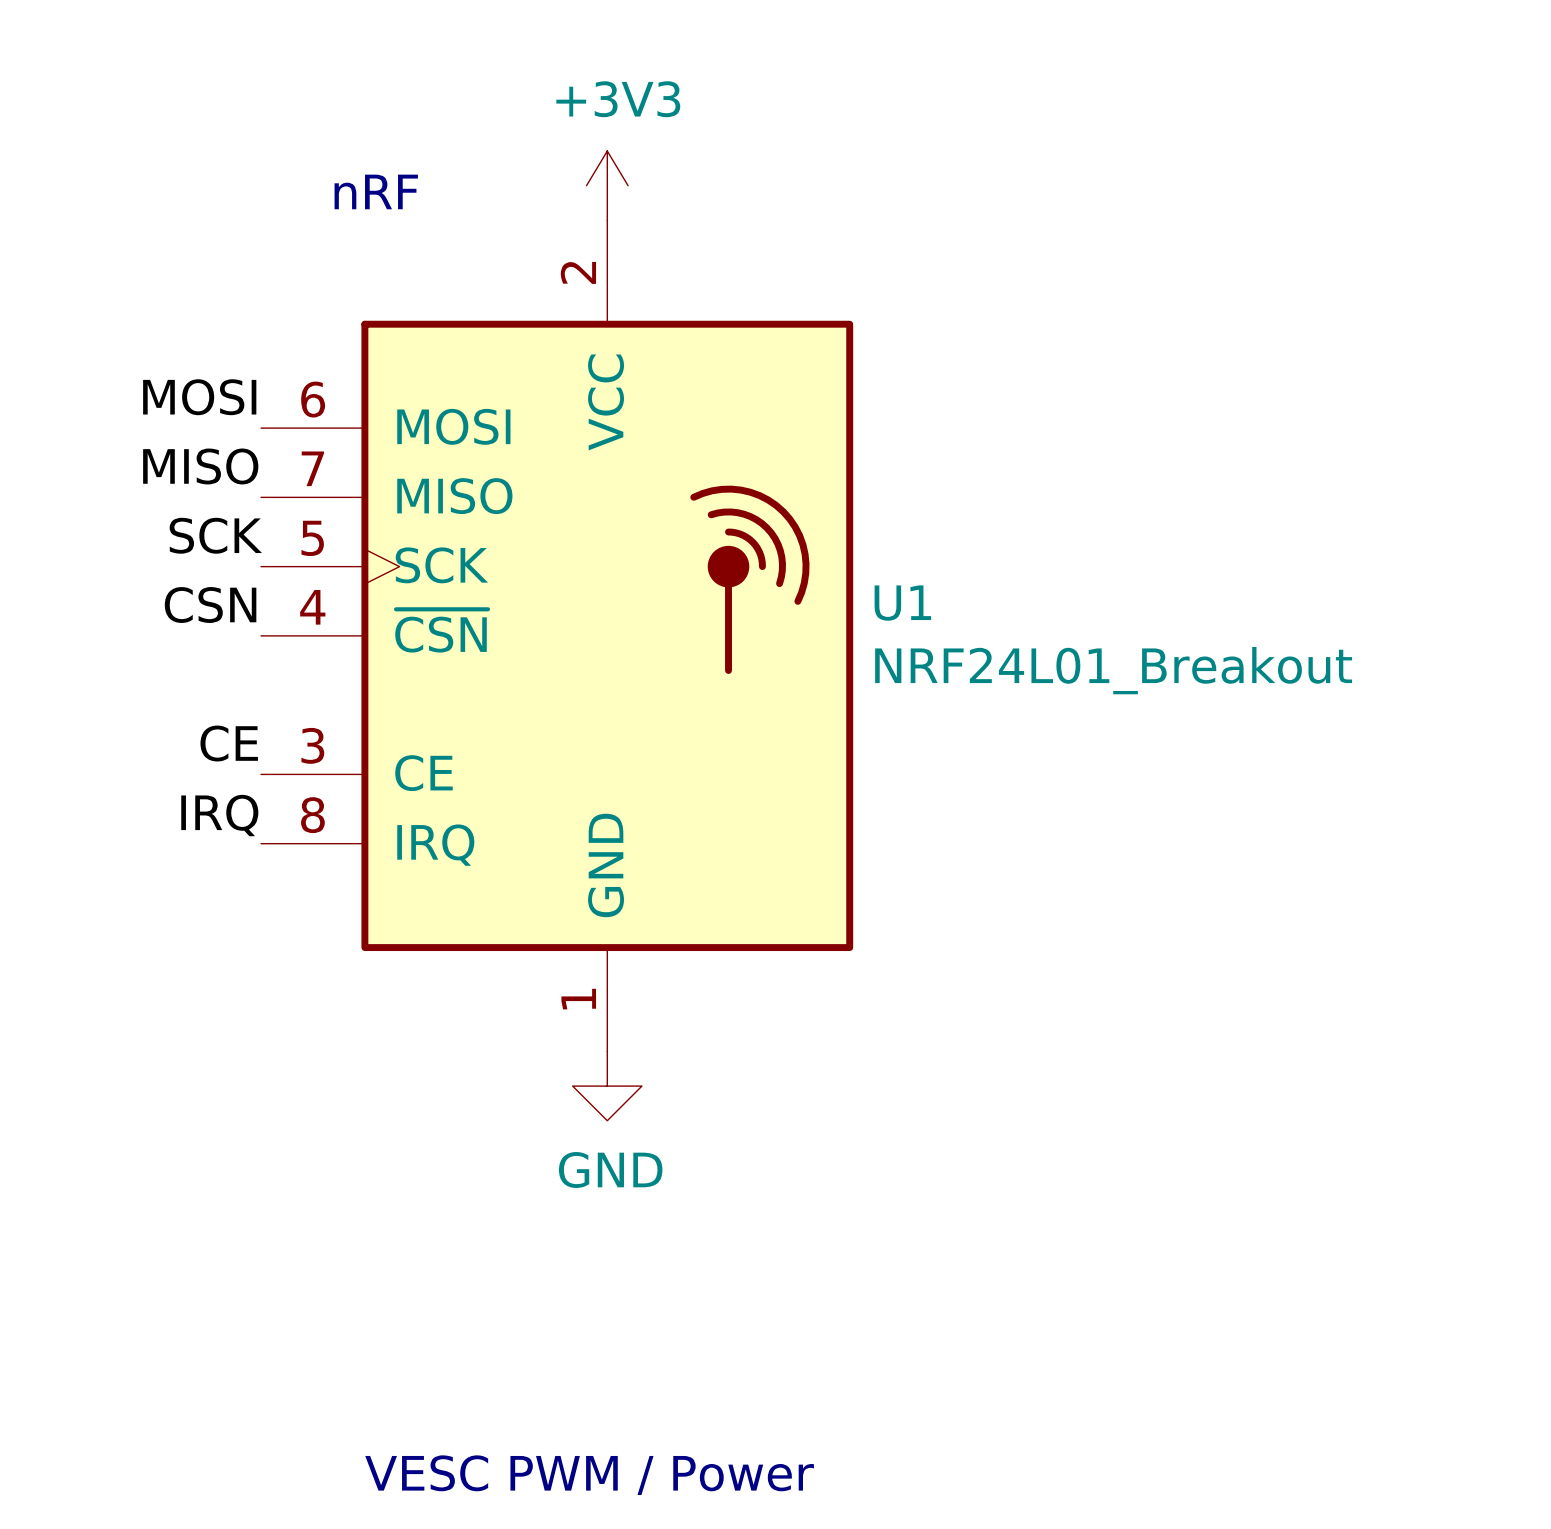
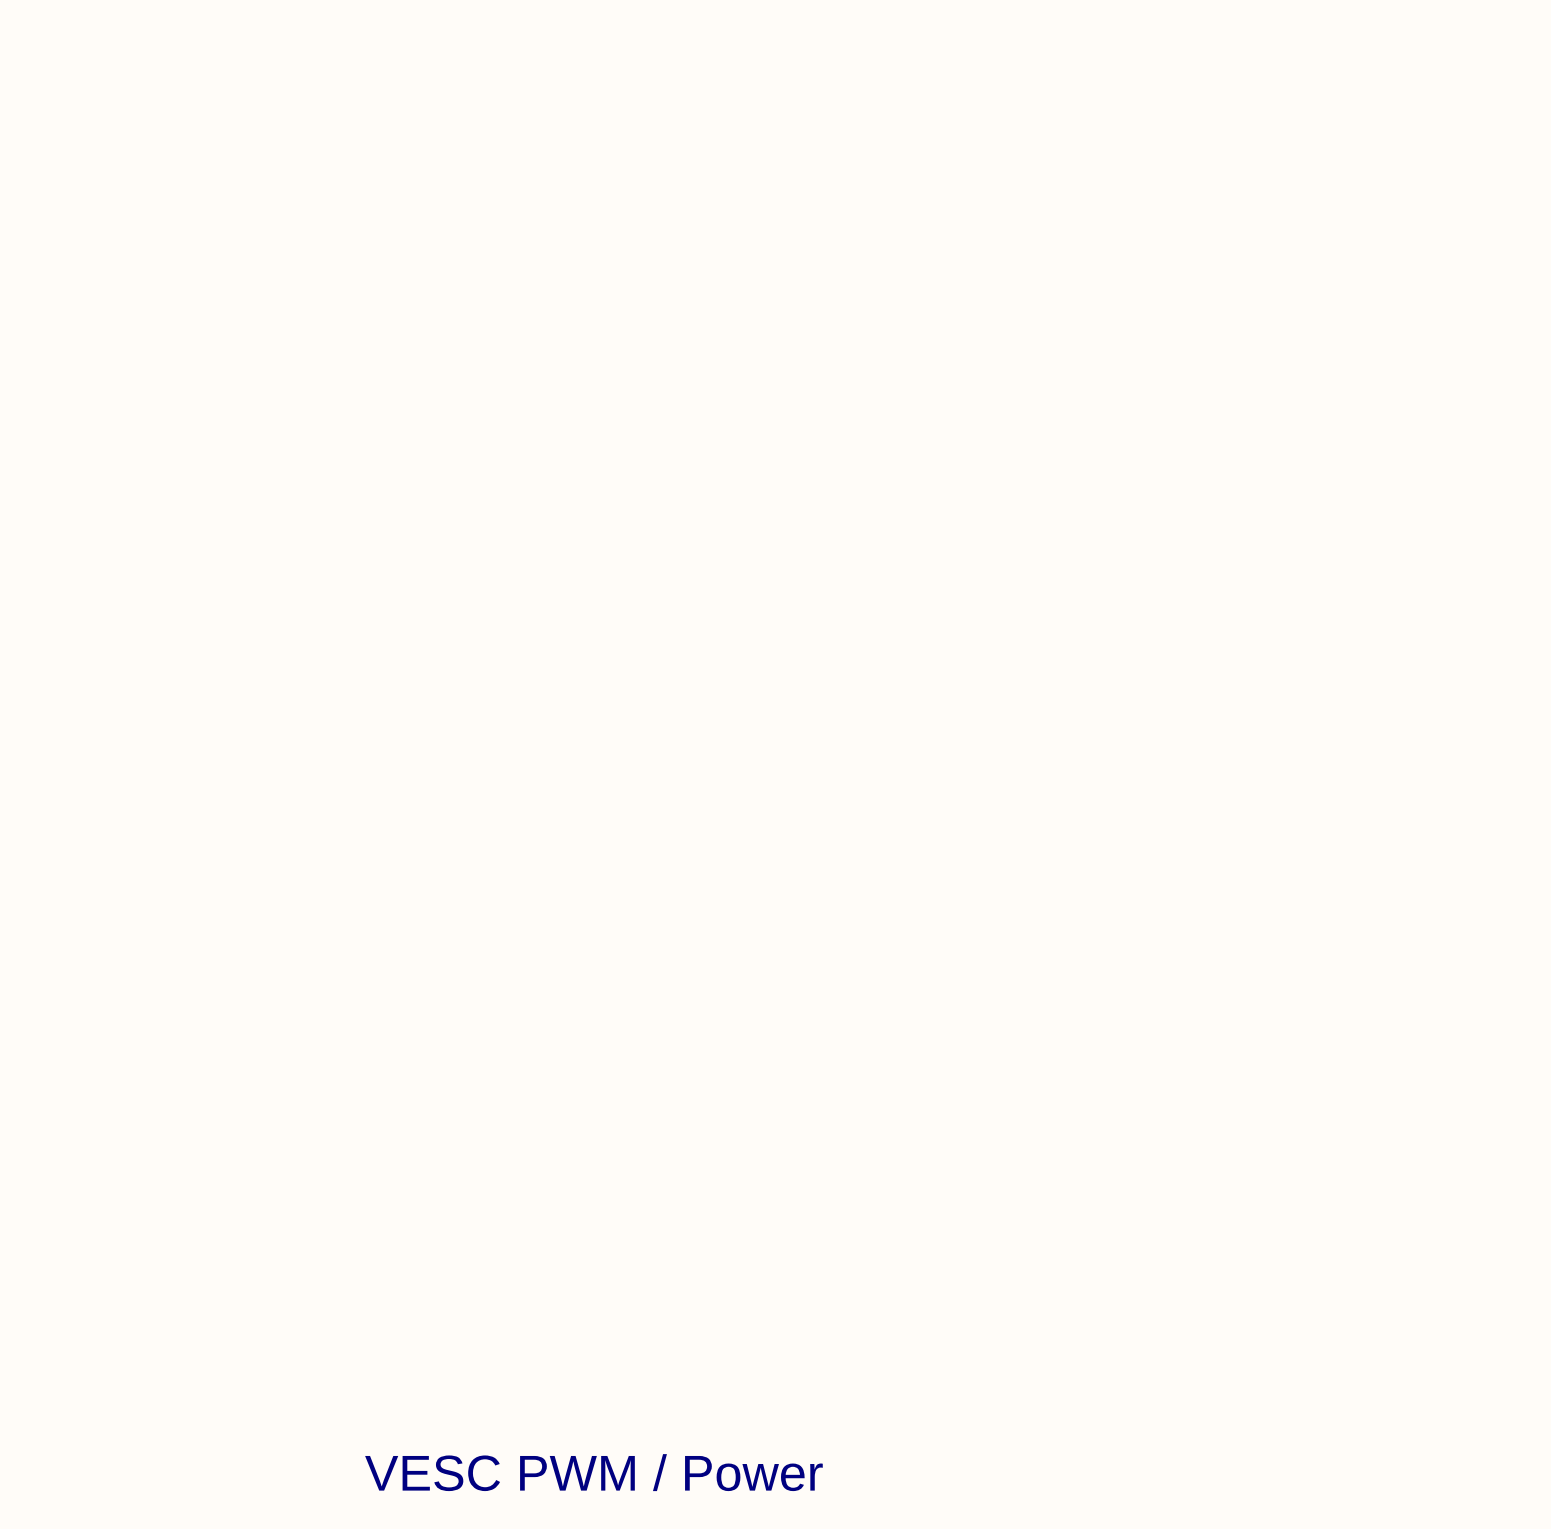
power symbol: +3V3 (607, 185) -> none
text: nRF (376, 191) -> none
label: MOSI (199, 397) -> none
label: MISO (200, 466) -> none
label: SCK (215, 535) -> none
label: CSN (210, 605) -> none
U1: NRF24L01_Breakout (557, 635) -> none
label: CE (229, 743) -> none
label: IRQ (219, 815) -> none
power symbol: GND (607, 1086) -> none

